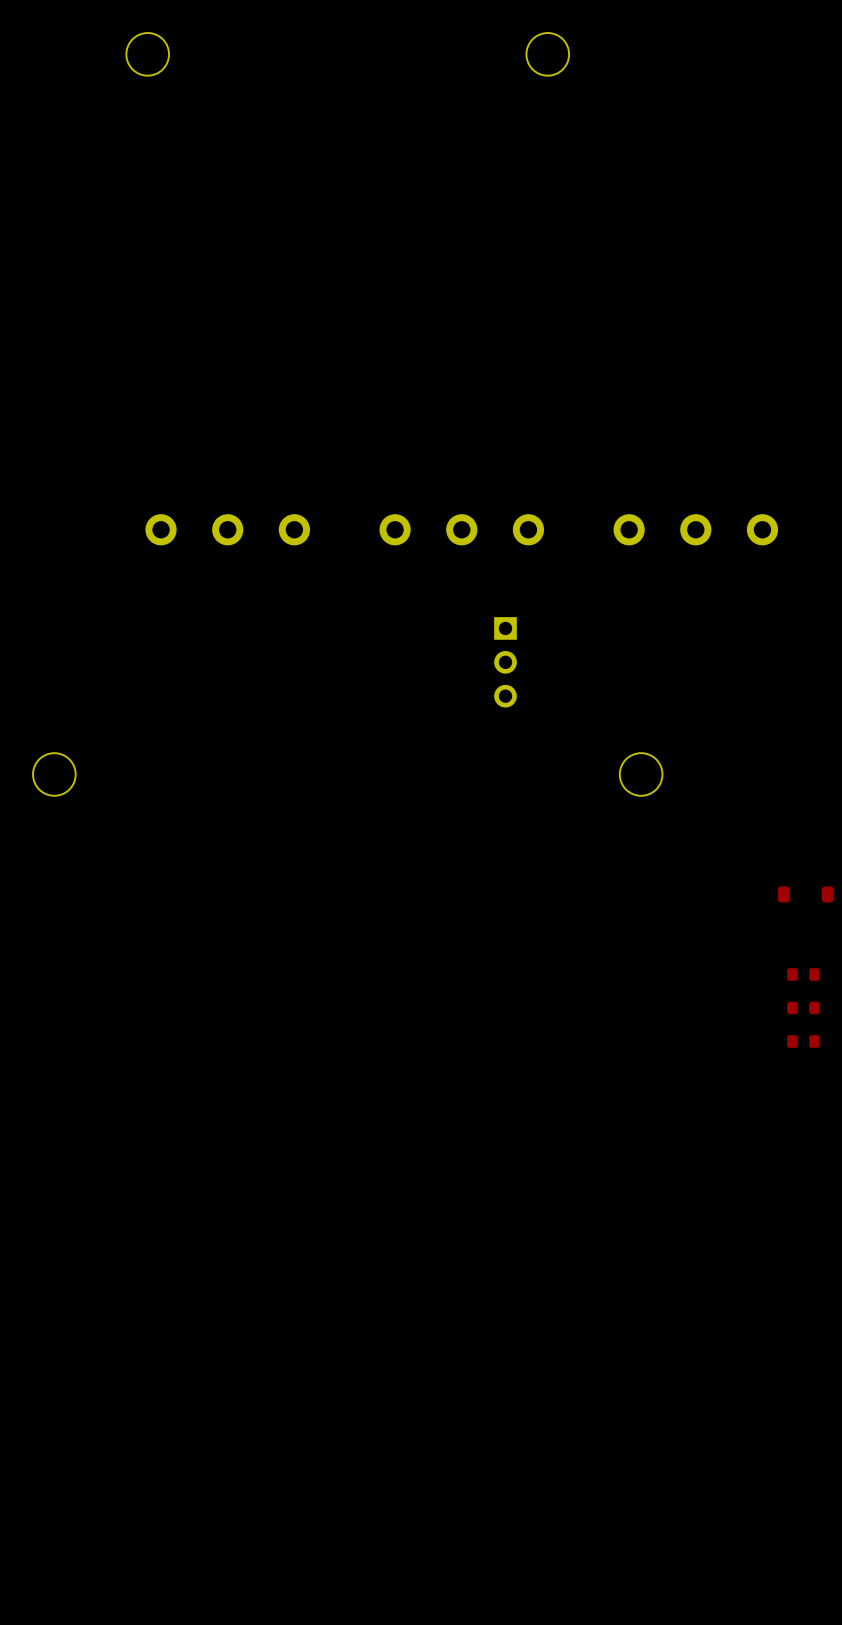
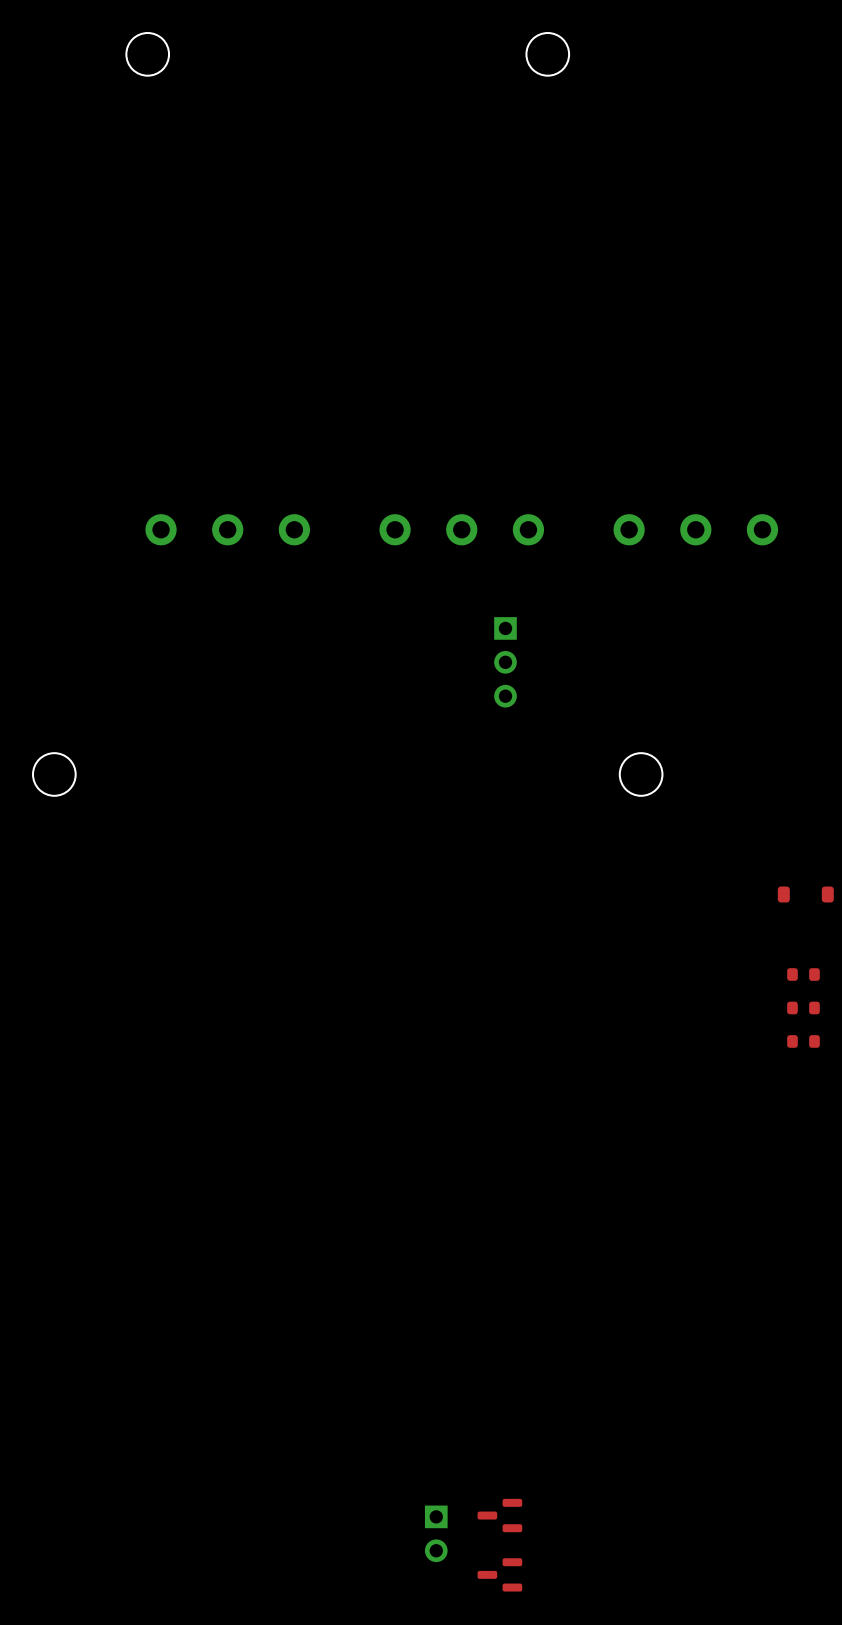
part: none -> (499, 1515)
part: none -> (436, 1533)
part: none -> (499, 1574)

